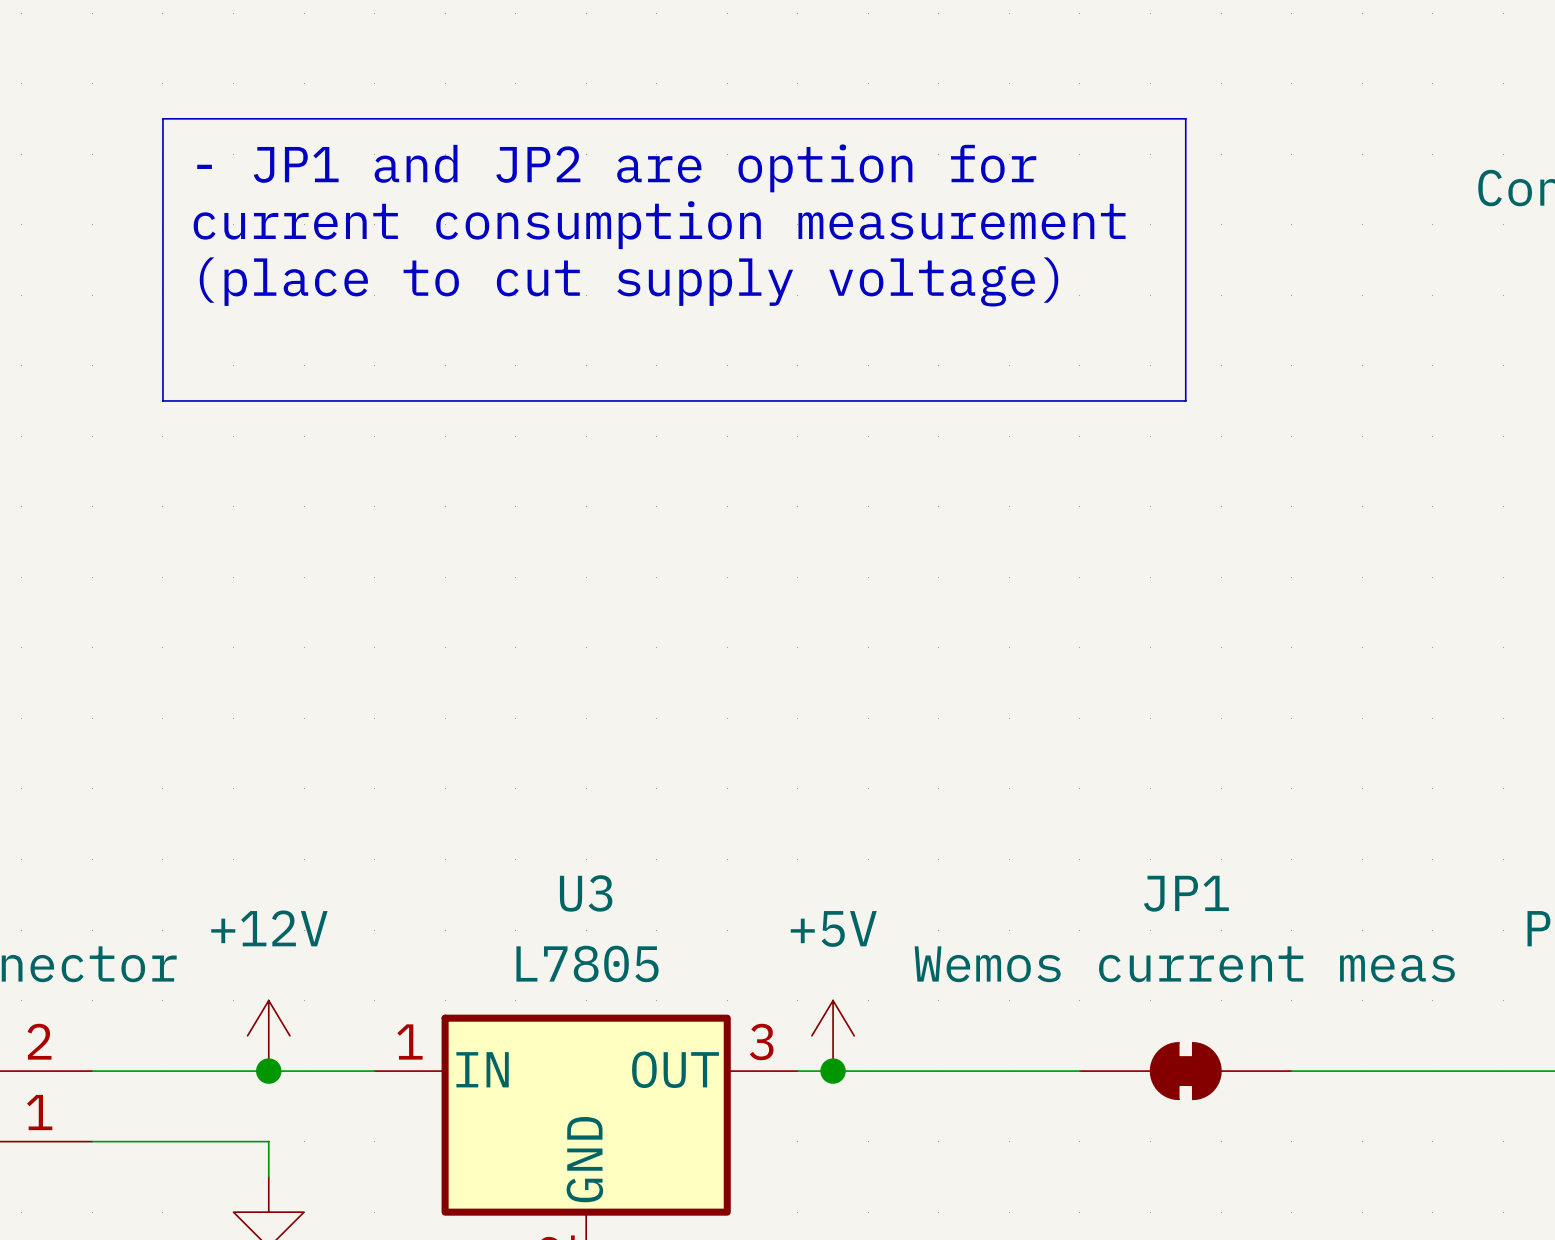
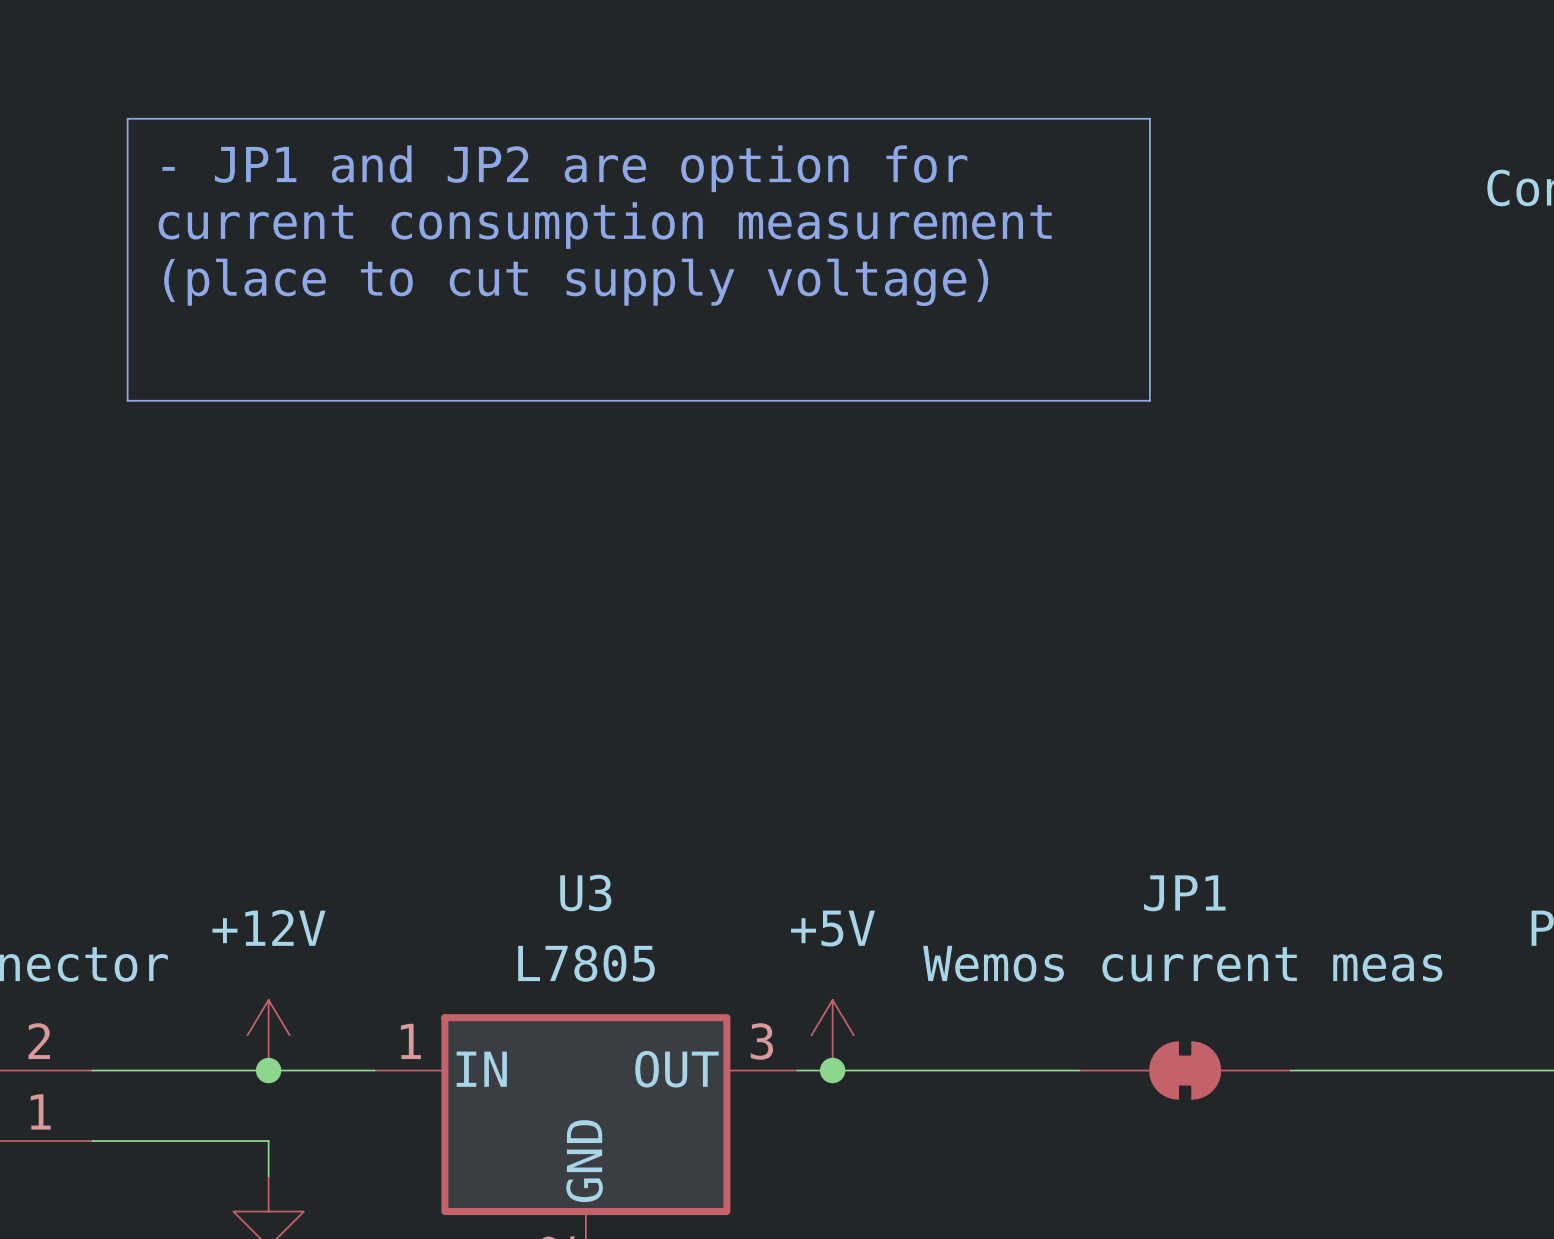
line: (162, 118) (162, 400) -> (162, 118) (127, 118) (127, 400) (162, 400)
line: (1150, 118) (1185, 118) (1185, 400) (1150, 400) -> (1149, 118) (1149, 400)
text position: - JP1 and JP2 are option for (616, 168) -> - JP1 and JP2 are option for (564, 168)
text position: current consumption measurement (659, 225) -> current consumption measurement (605, 225)
text position: (place to cut supply voltage) (629, 281) -> (place to cut supply voltage) (576, 282)

